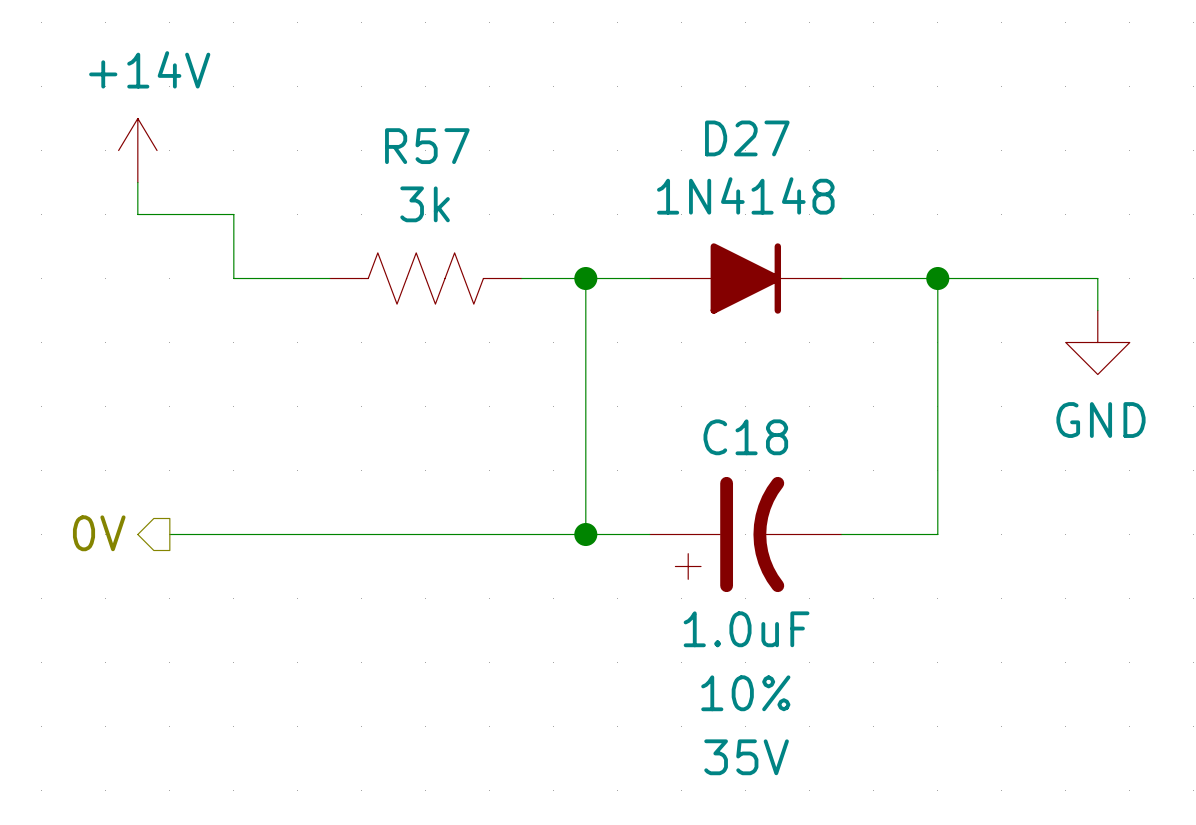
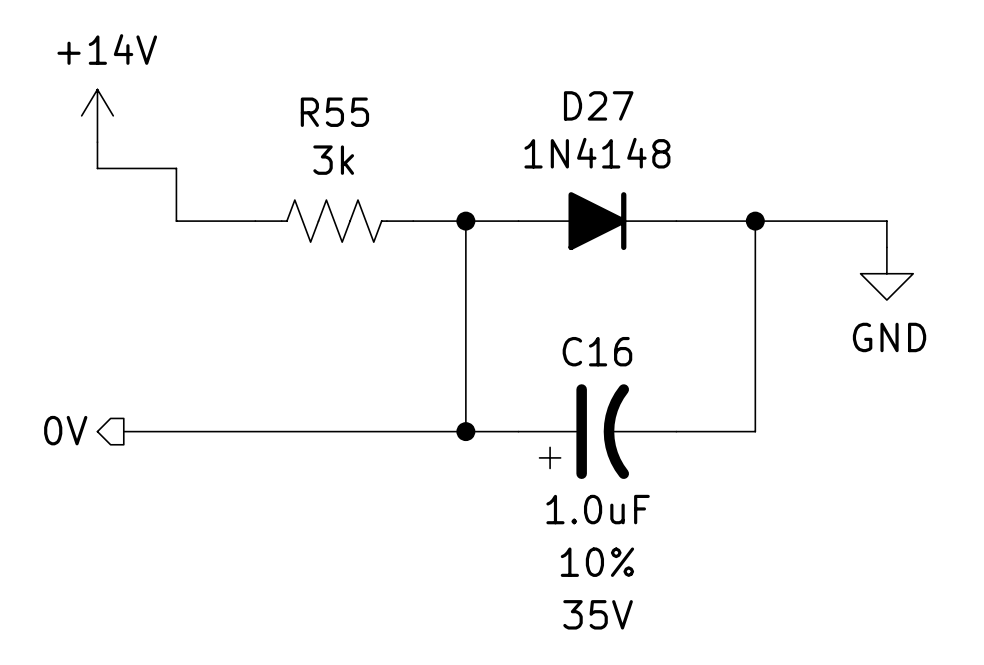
R57 name: R57 (427, 146) -> R55 (334, 112)
C18 name: C18 (745, 437) -> C16 (597, 351)

